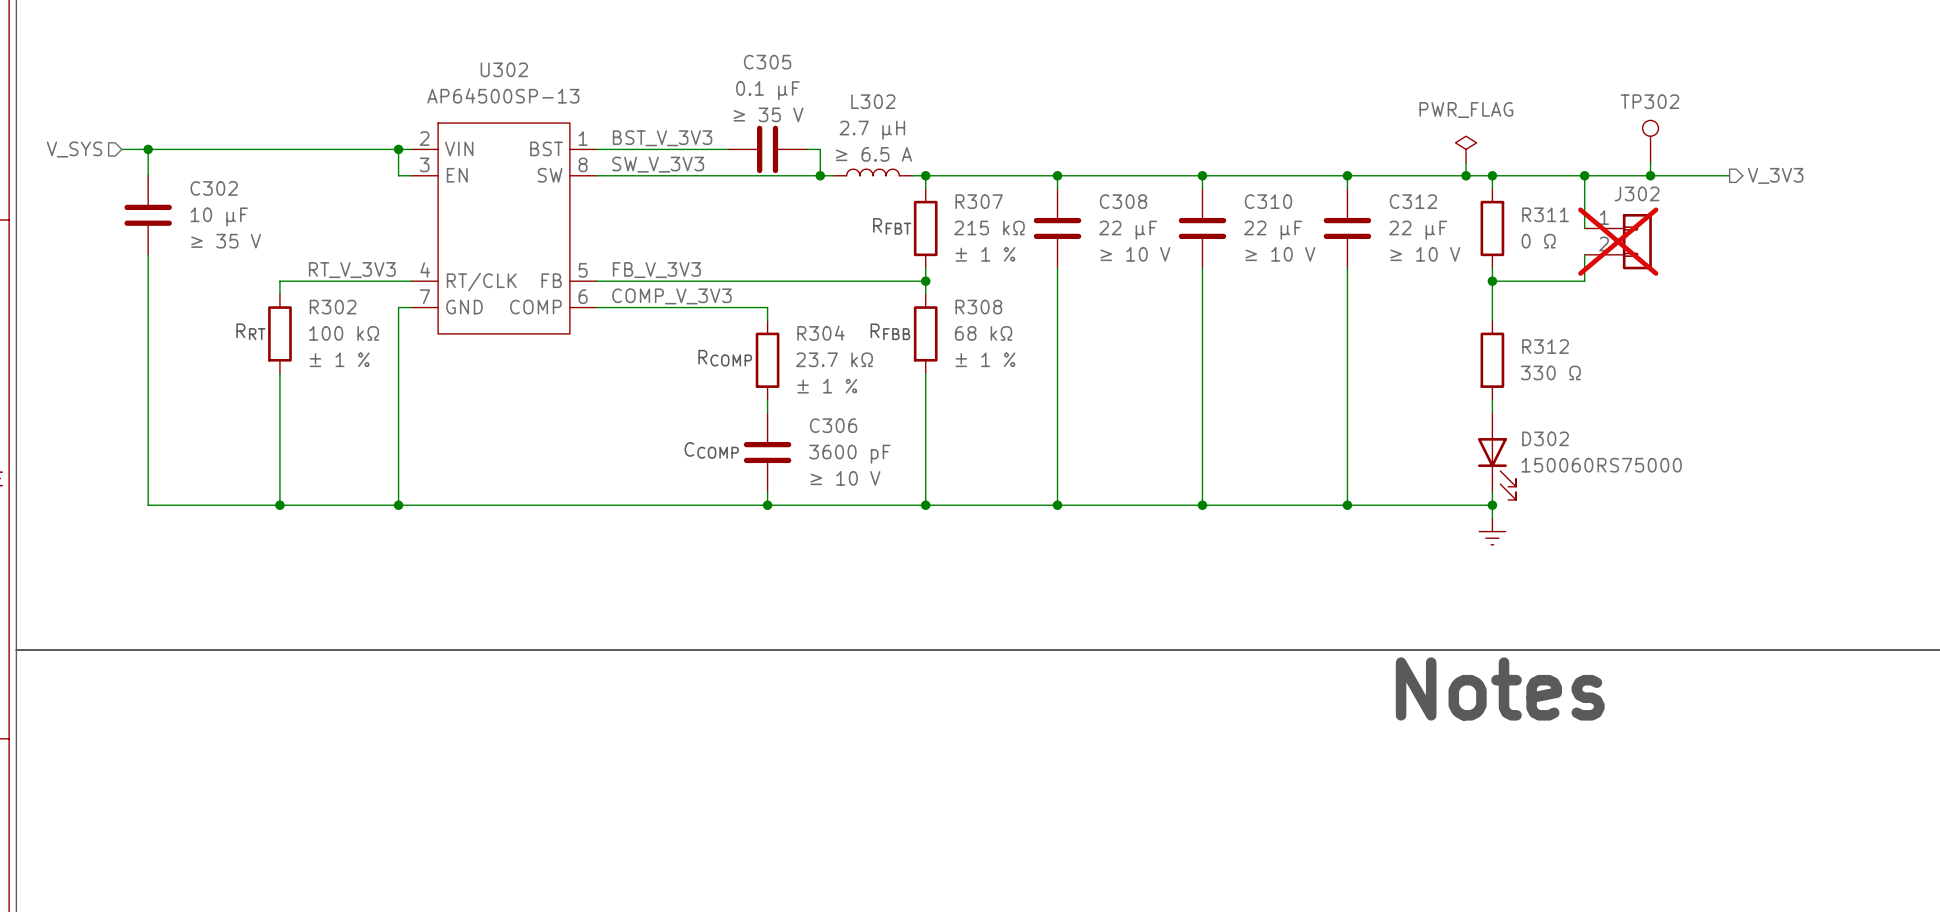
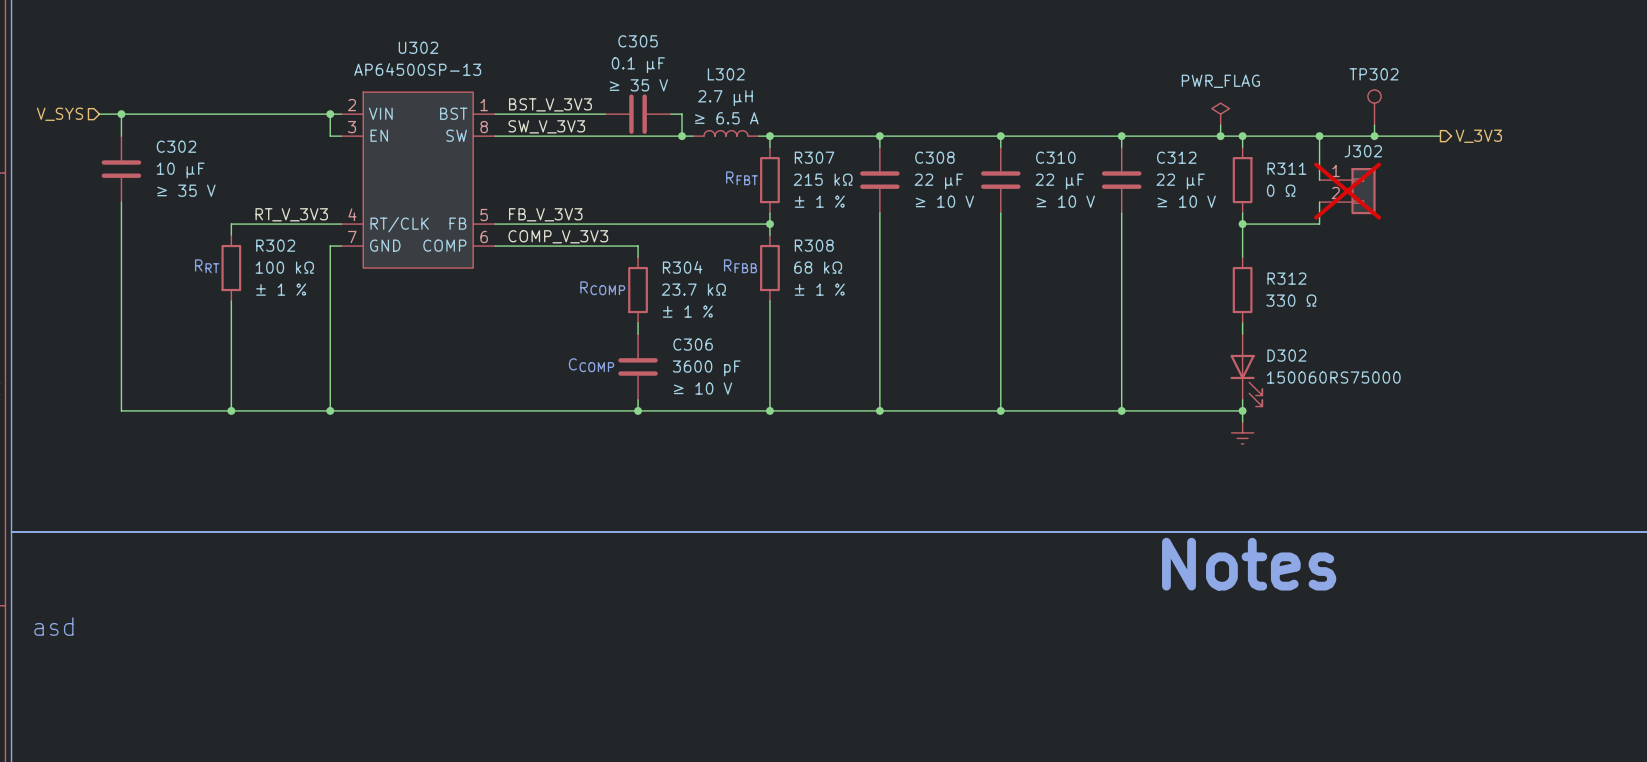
text: none -> asd (53, 626)

